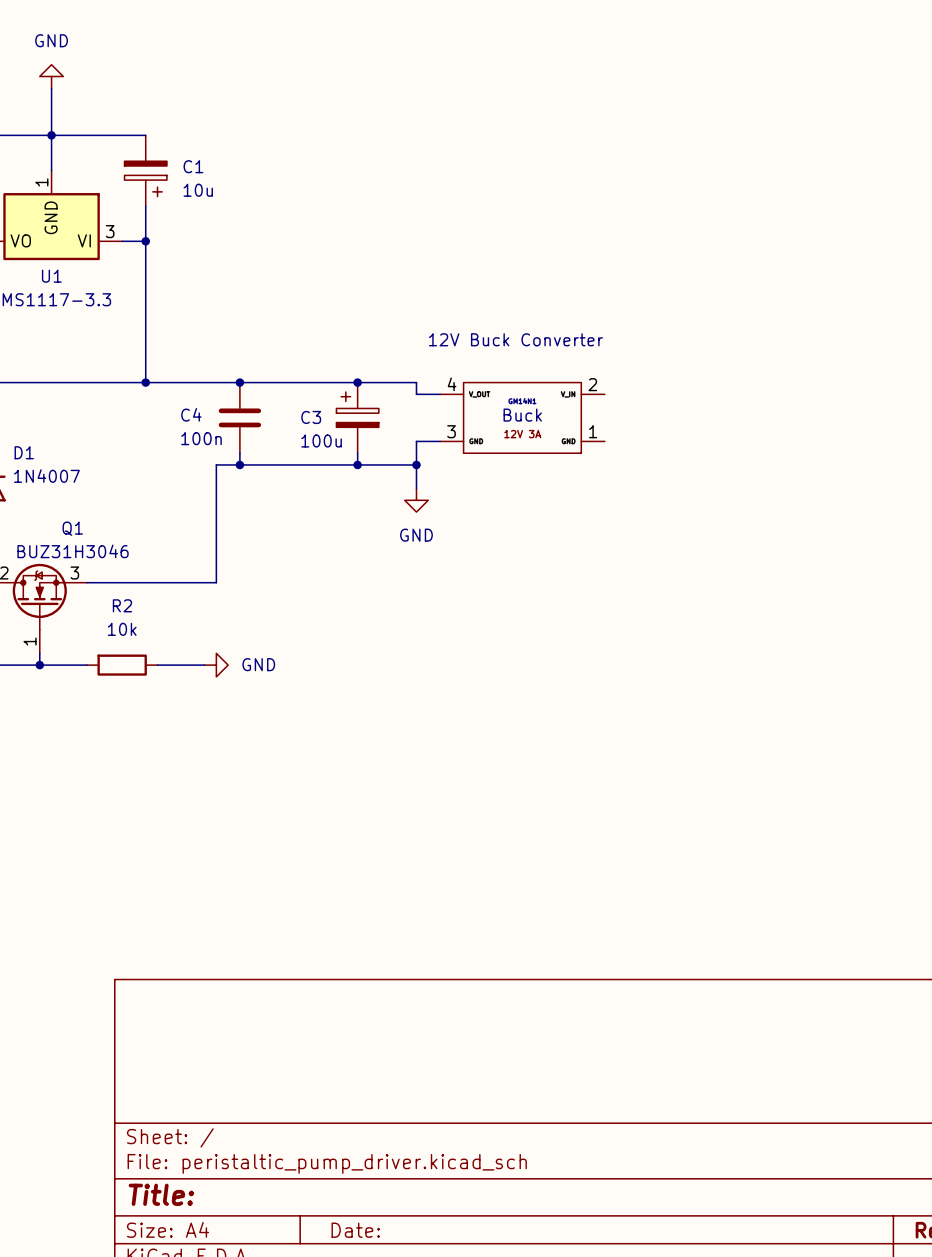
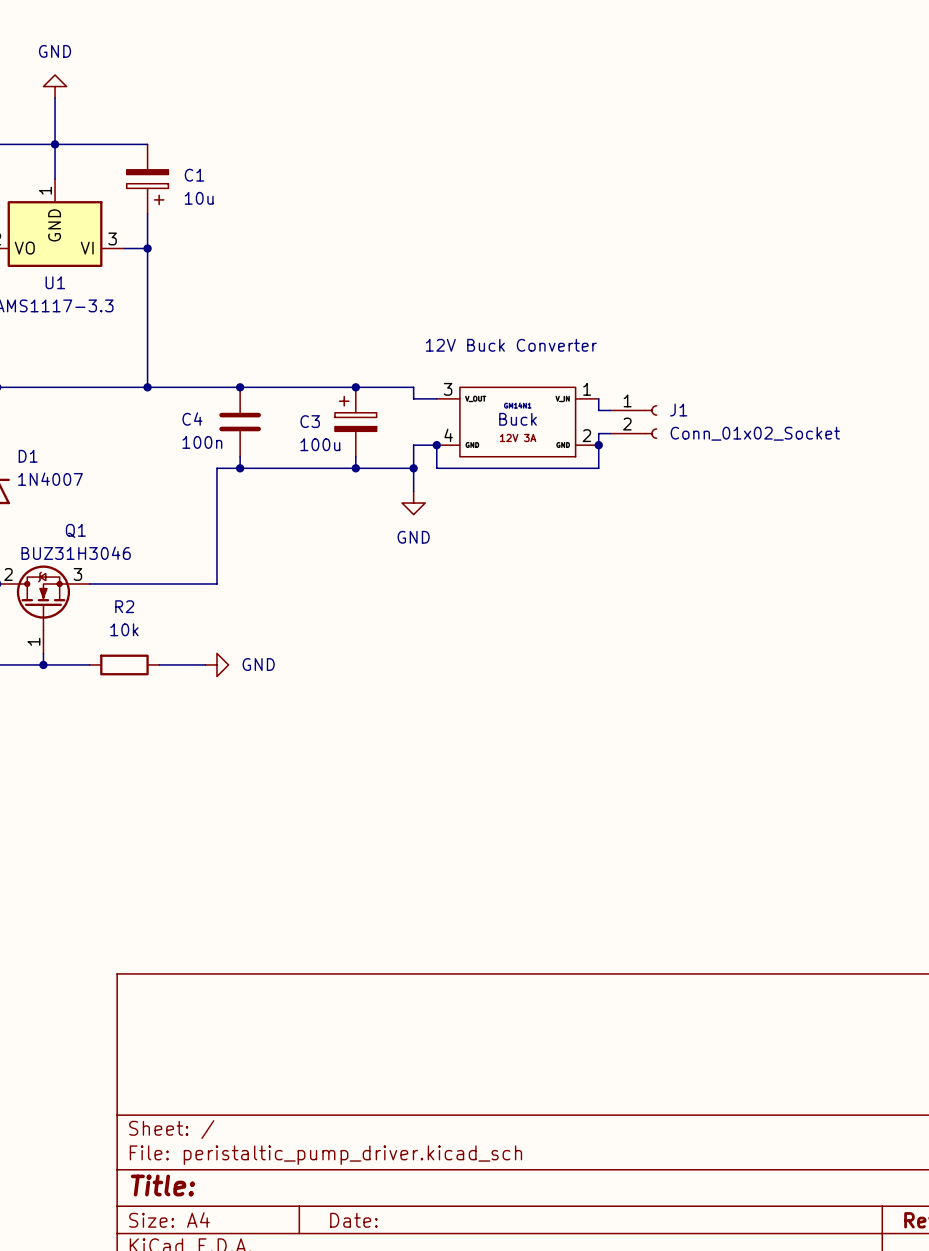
part pin number: 4 (452, 384) -> 3 (448, 389)
part pin number: 2 (592, 384) -> 1 (587, 389)
wire: none -> (598, 398) (598, 410) (610, 410)
J1: none -> Conn_01x02_Socket (633, 422)
wire: none -> (610, 433) (598, 433) (598, 468) (436, 468) (436, 445)
part pin number: 3 (451, 431) -> 4 (448, 435)
part pin number: 1 (593, 431) -> 2 (586, 435)
junction: none -> (436, 445)
junction: none -> (598, 445)

